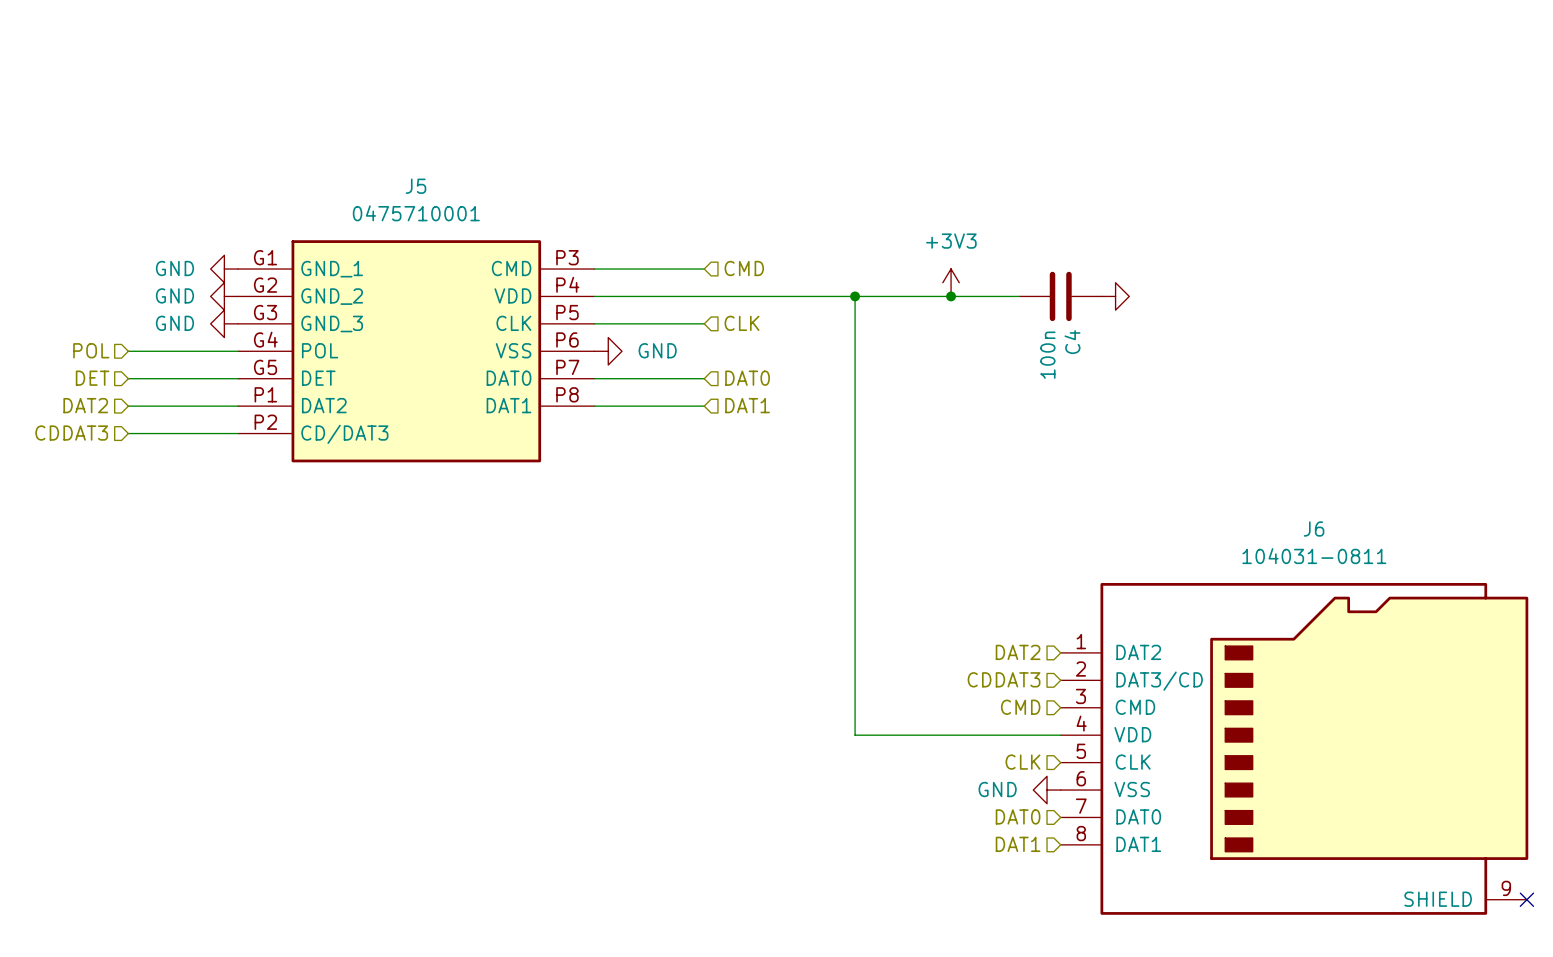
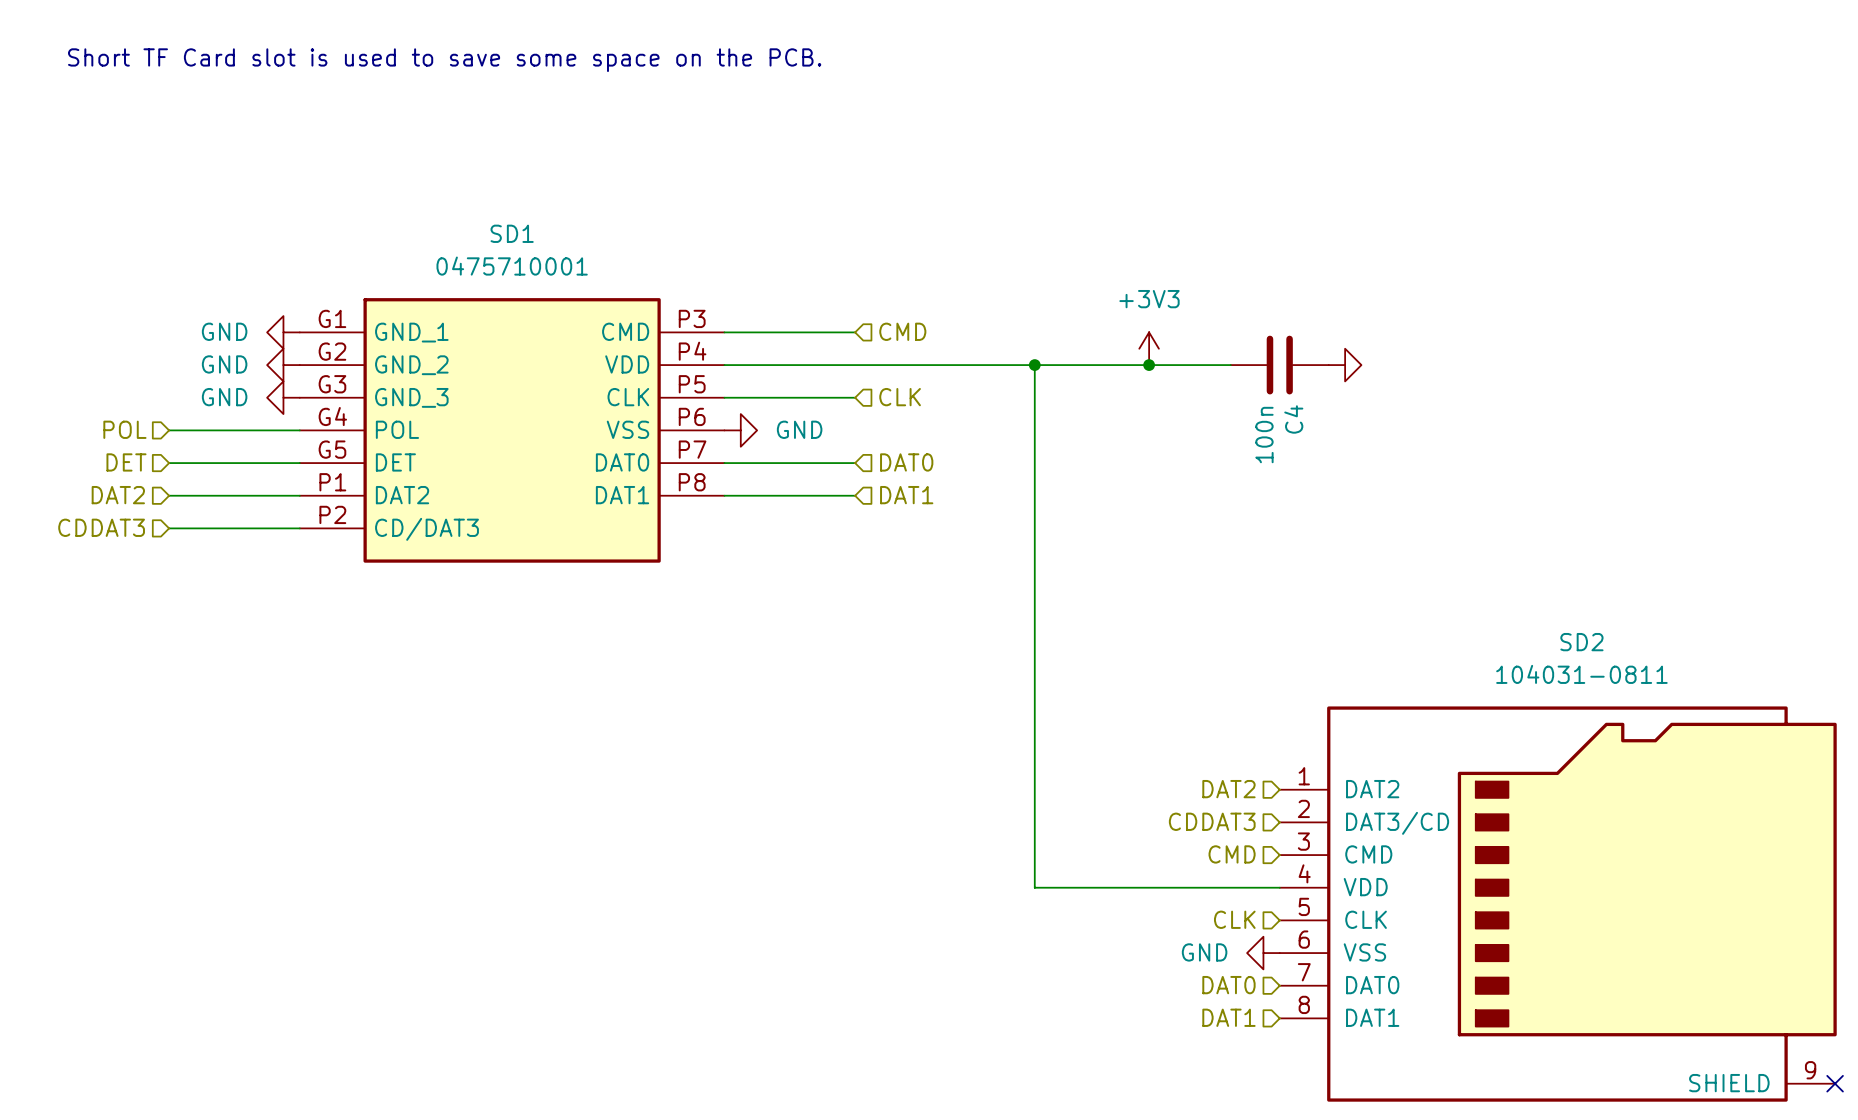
text: none -> Short TF Card slot is used to save some space on the PCB. (444, 60)
J5 name: J5 (415, 186) -> SD1 (512, 233)
J6 name: J6 (1314, 529) -> SD2 (1581, 642)

